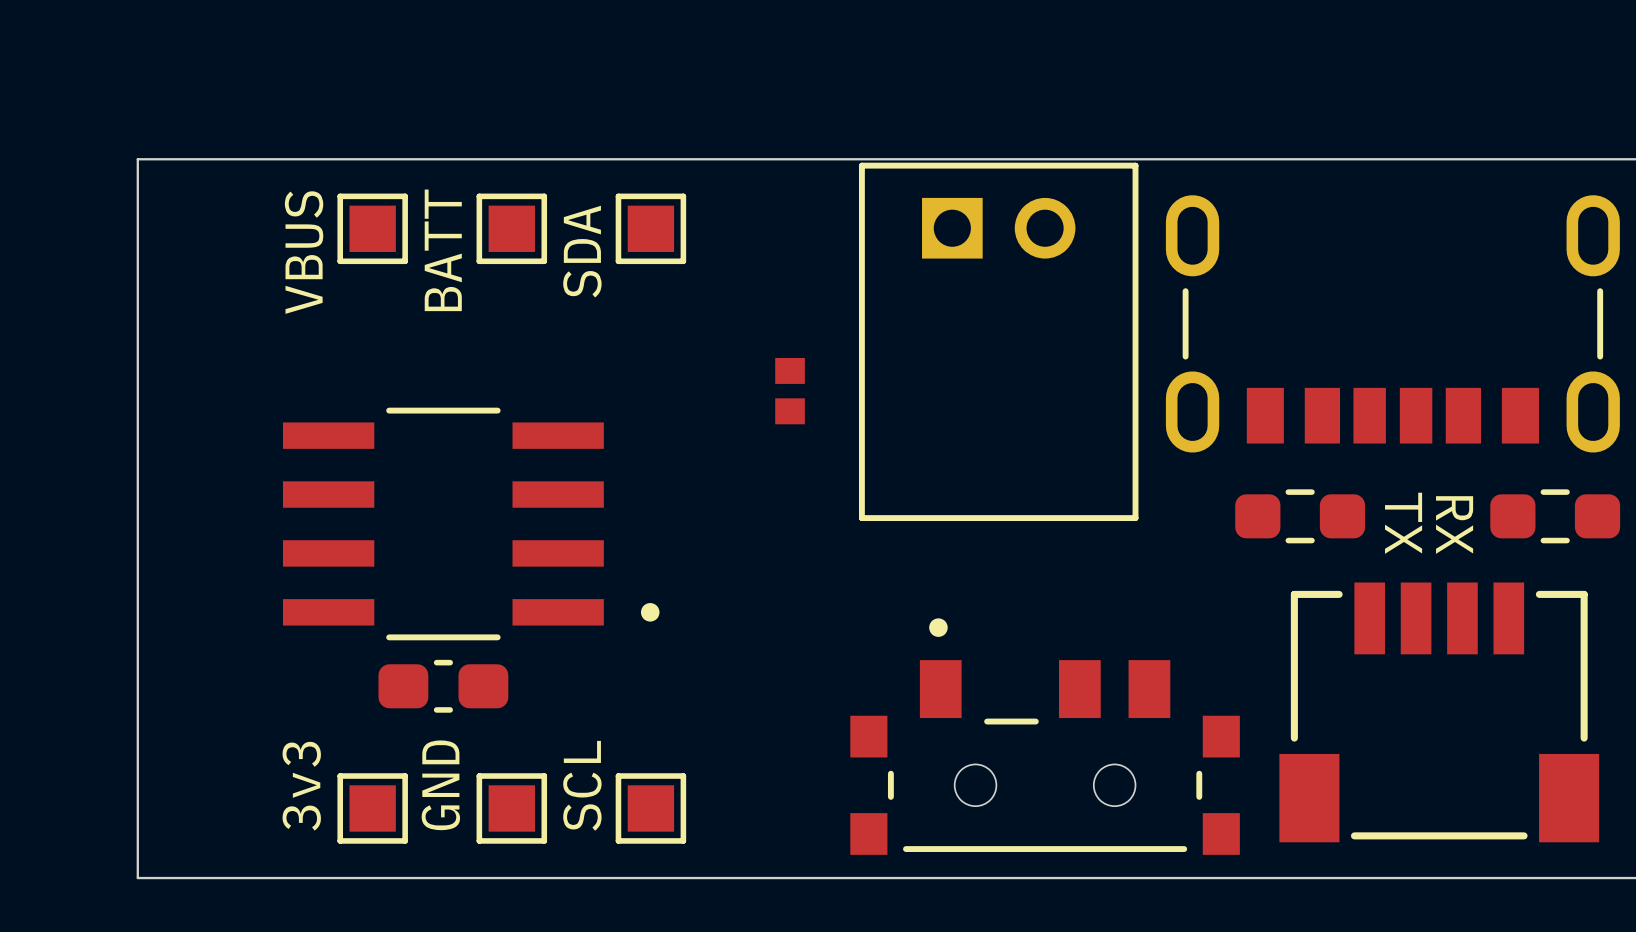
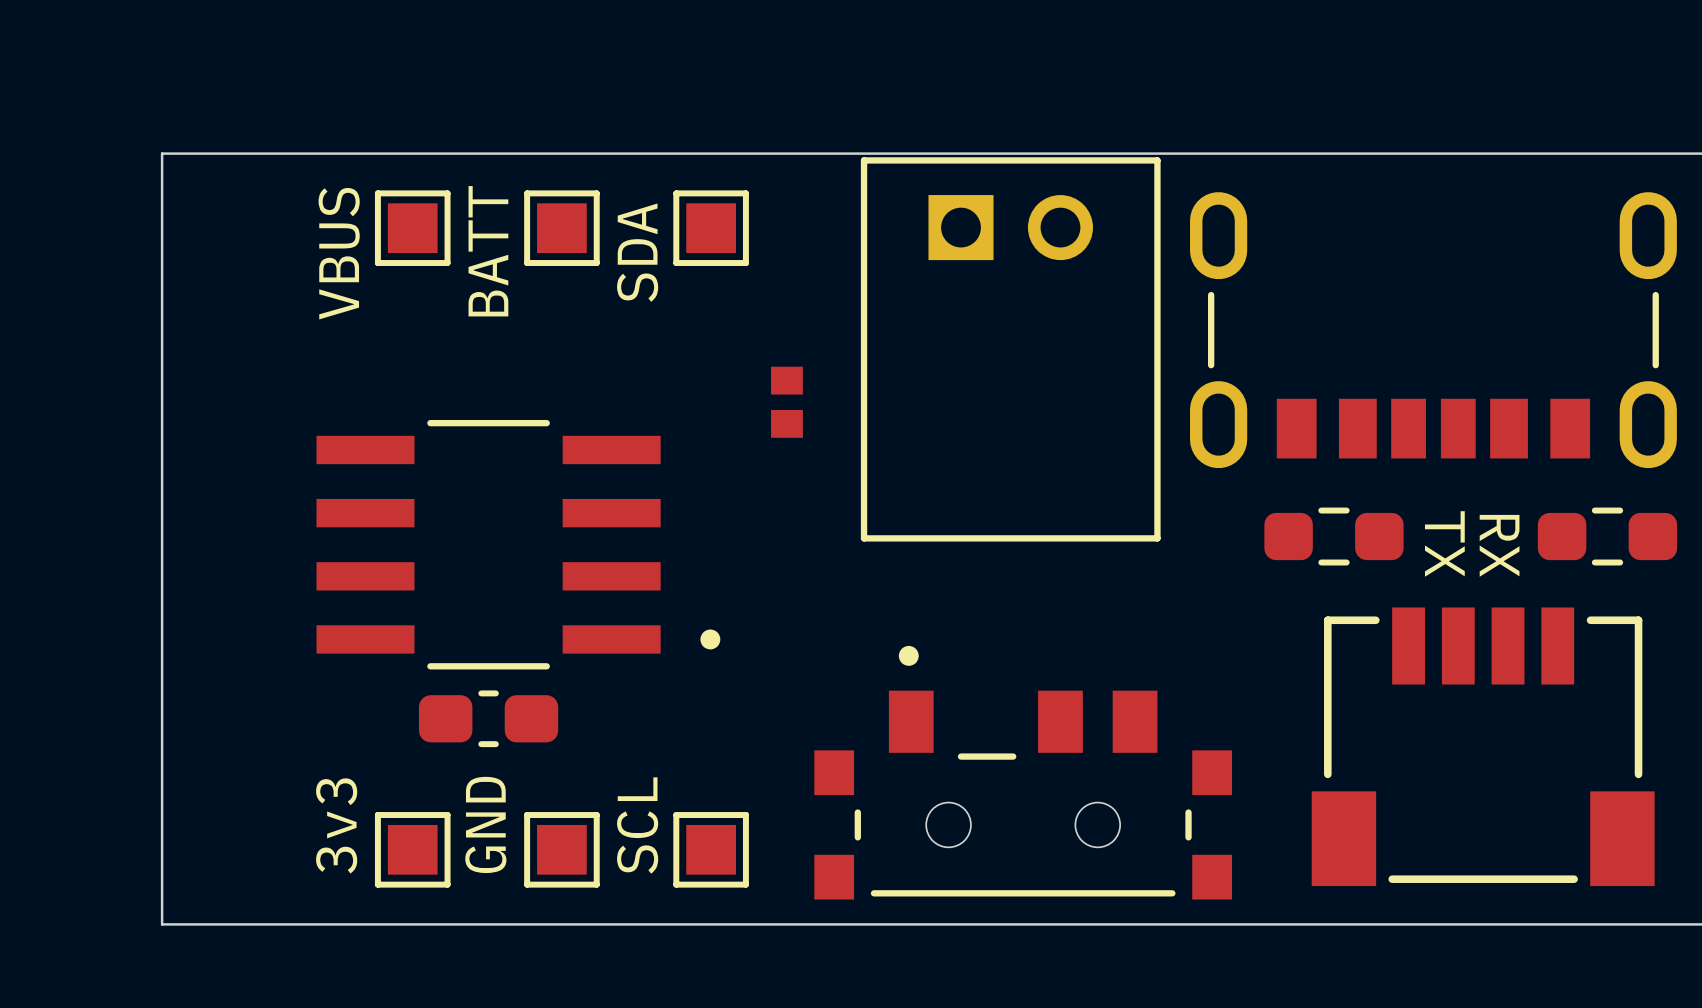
board edge: (207, 159) (137, 159) (137, 878) (207, 878) -> (162, 153) (162, 924)
VBUS position: (372, 228) -> (412, 228)
BATT position: (511, 228) -> (561, 228)
SDA position: (650, 228) -> (711, 228)
part position: (471, 523) -> (518, 544)
part position: (443, 686) -> (488, 718)
part position: (1045, 736) -> (1023, 772)
3v3 position: (372, 808) -> (412, 849)
GND position: (511, 808) -> (561, 849)
SCL position: (650, 808) -> (711, 849)

